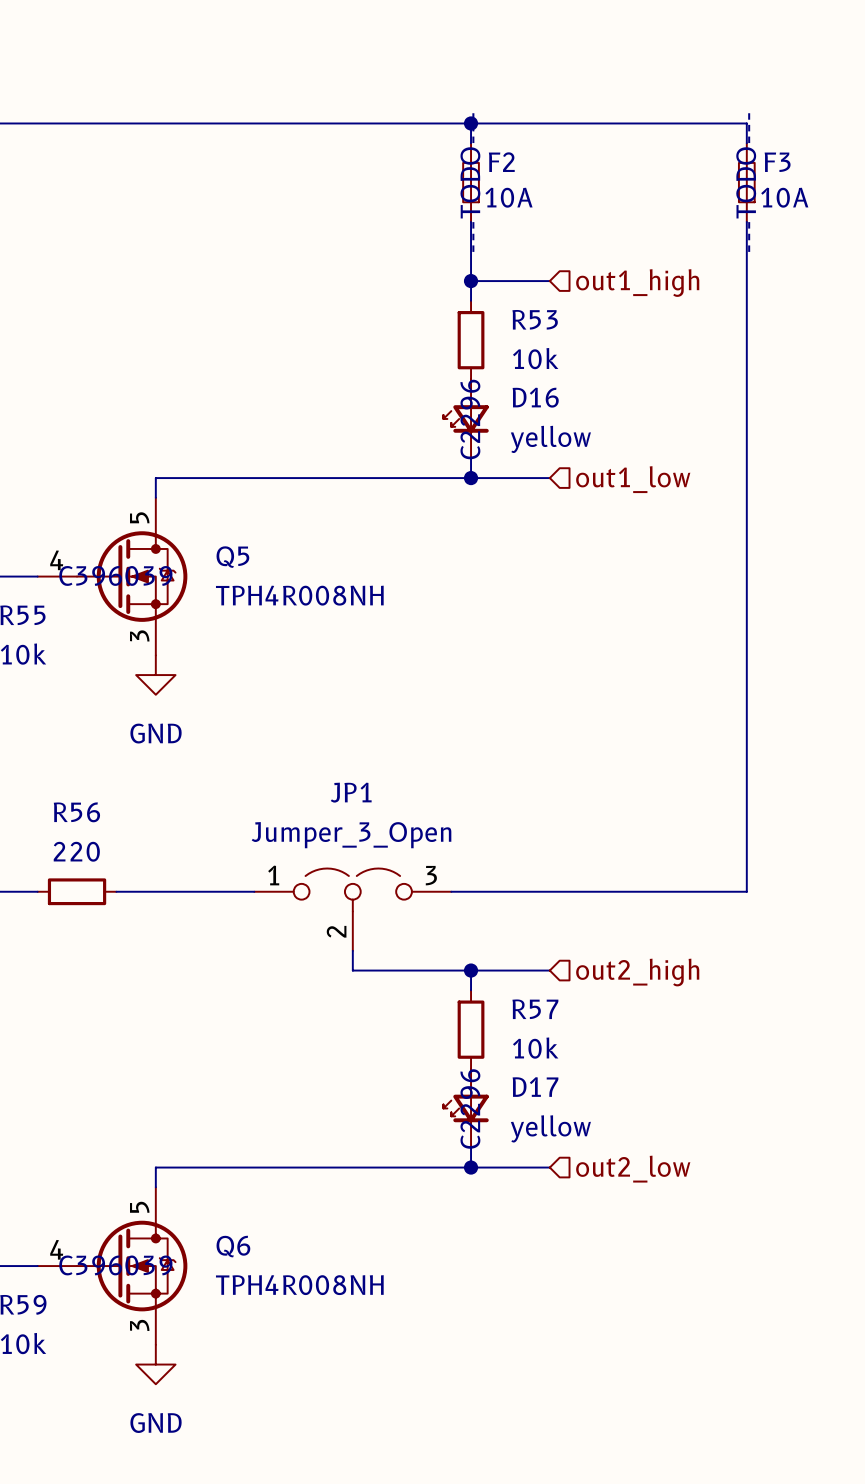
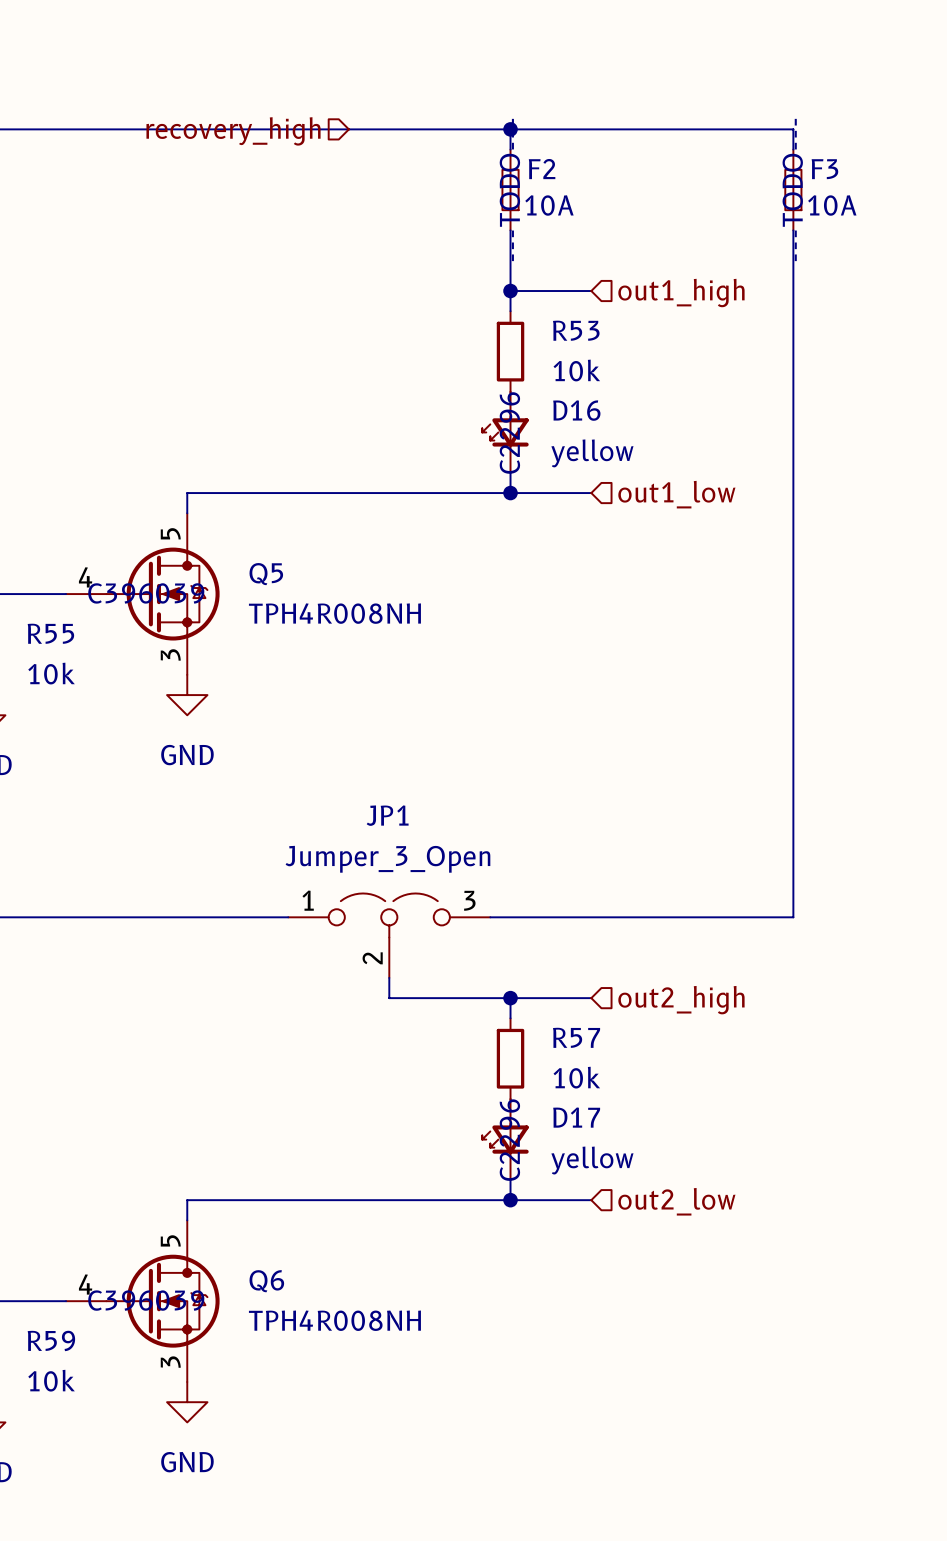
hierarchical label: none -> recovery_high (233, 131)
wire: none -> (66, 917) (146, 917)
R56: 220 (77, 891) -> none

